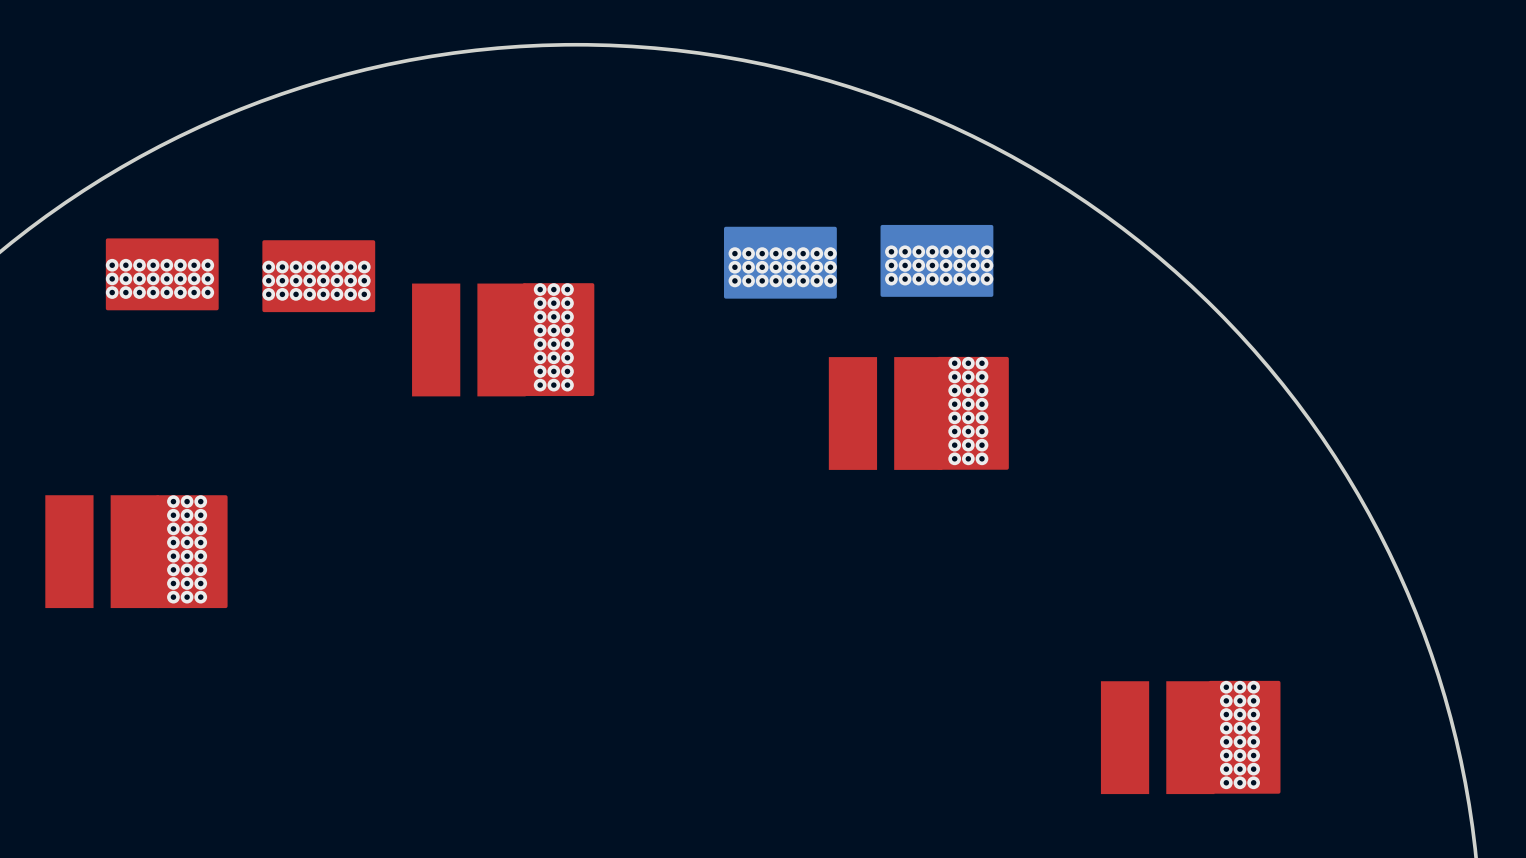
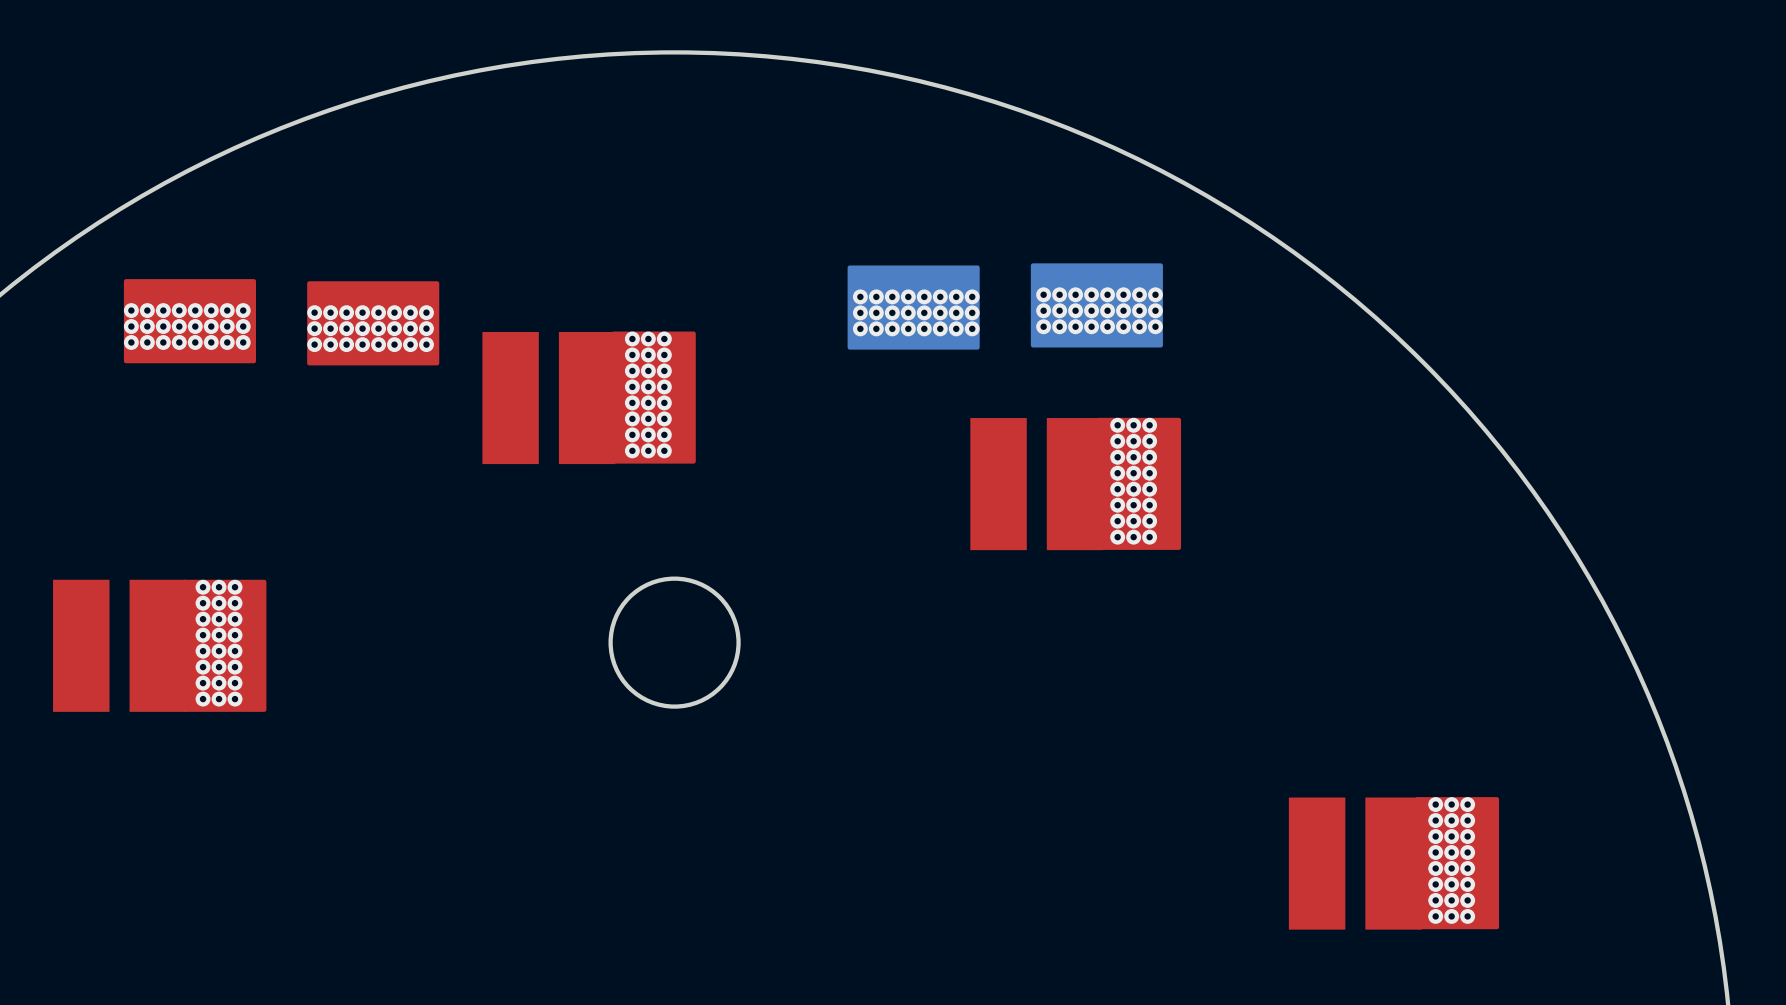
round board edge: none -> [608, 576, 741, 709]

